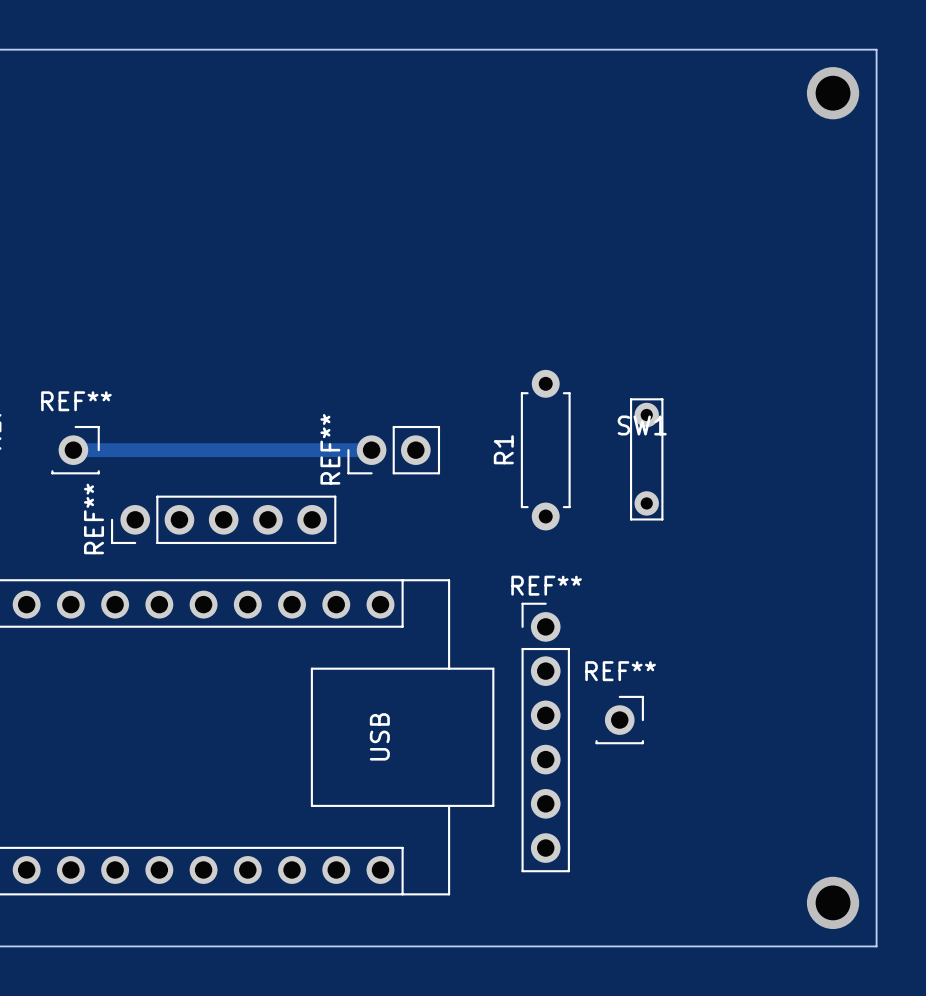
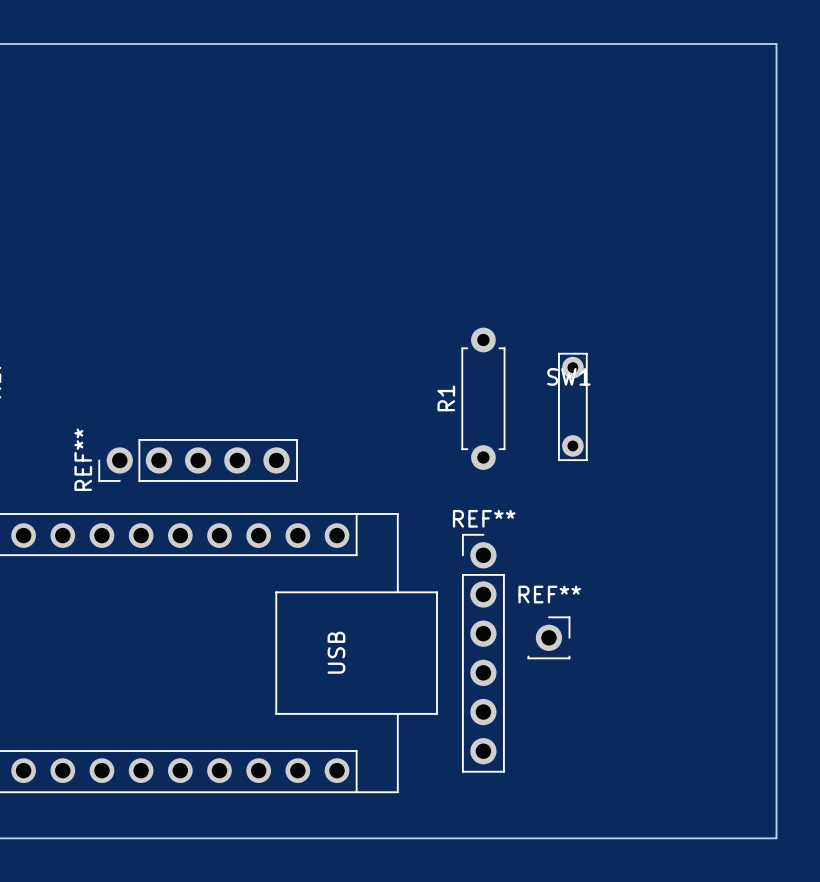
via: (833, 93) -> none
track: (73, 450) (371, 450) -> none
REF**: (75, 450) -> none
REF**: (393, 450) -> none
via: (833, 902) -> none

